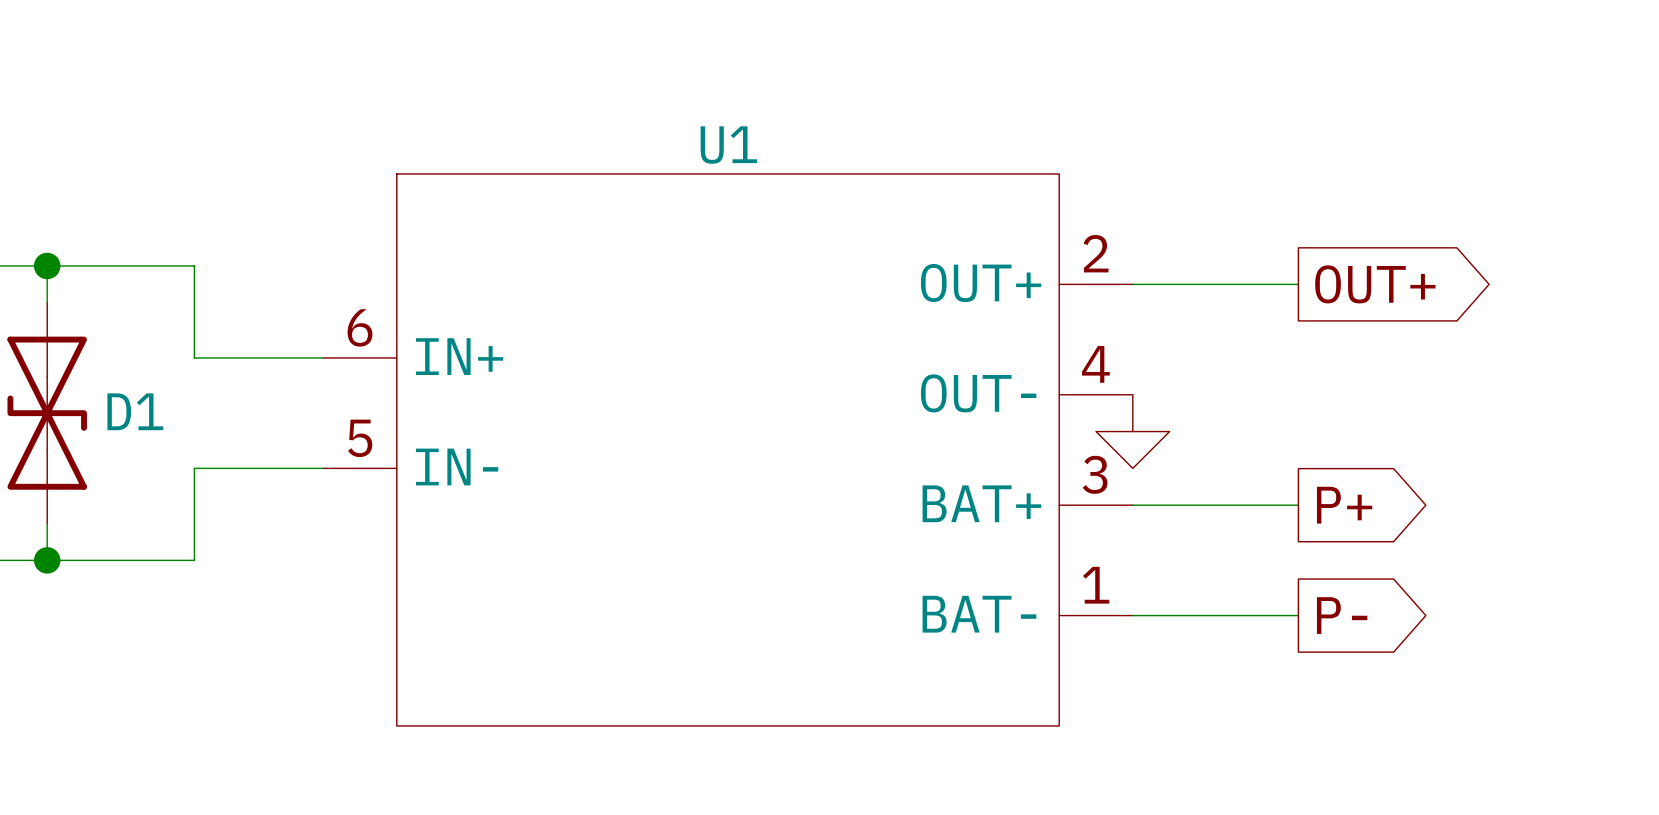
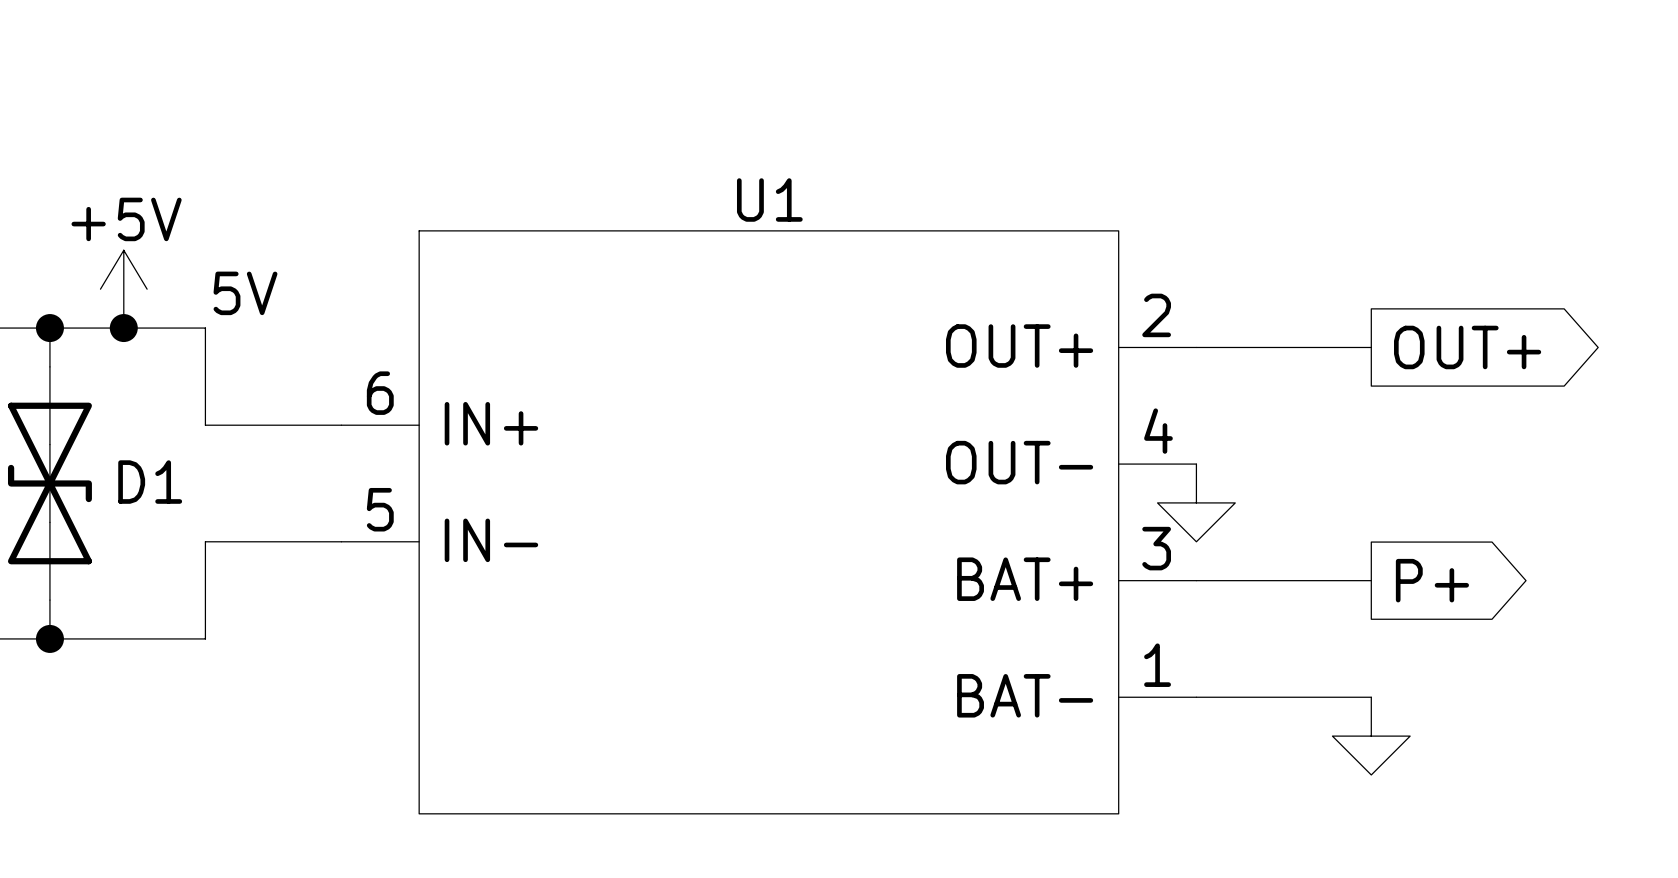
power symbol: none -> +5V (123, 289)
label: none -> 5V (245, 293)
junction: none -> (123, 328)
global label: P- (1342, 615) -> none
power symbol: none -> (1371, 736)

